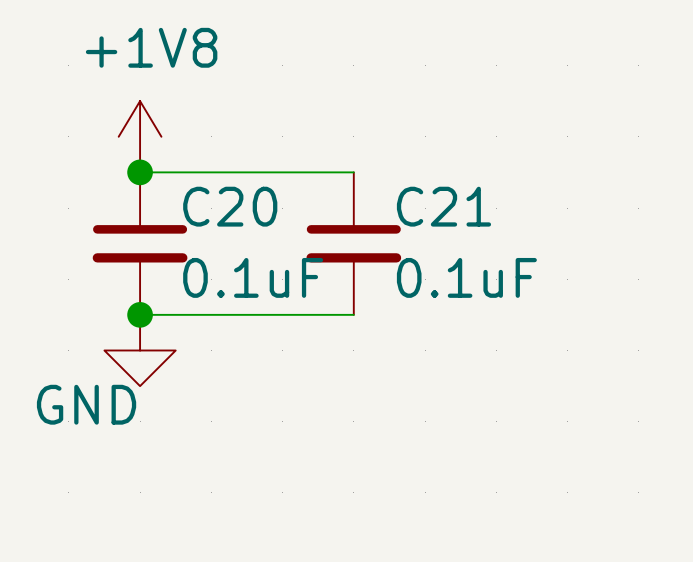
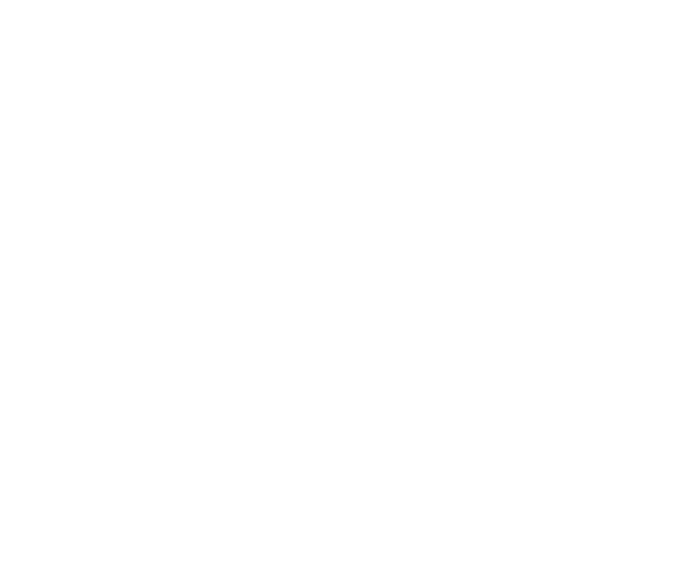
power symbol: +1V8 (140, 136) -> none
wire: (140, 172) (353, 172) -> none
junction: (140, 172) -> none
C20: 0.1uF (140, 243) -> none
C21: 0.1uF (353, 243) -> none
wire: (140, 314) (353, 314) -> none
junction: (140, 314) -> none
power symbol: GND (140, 350) -> none

